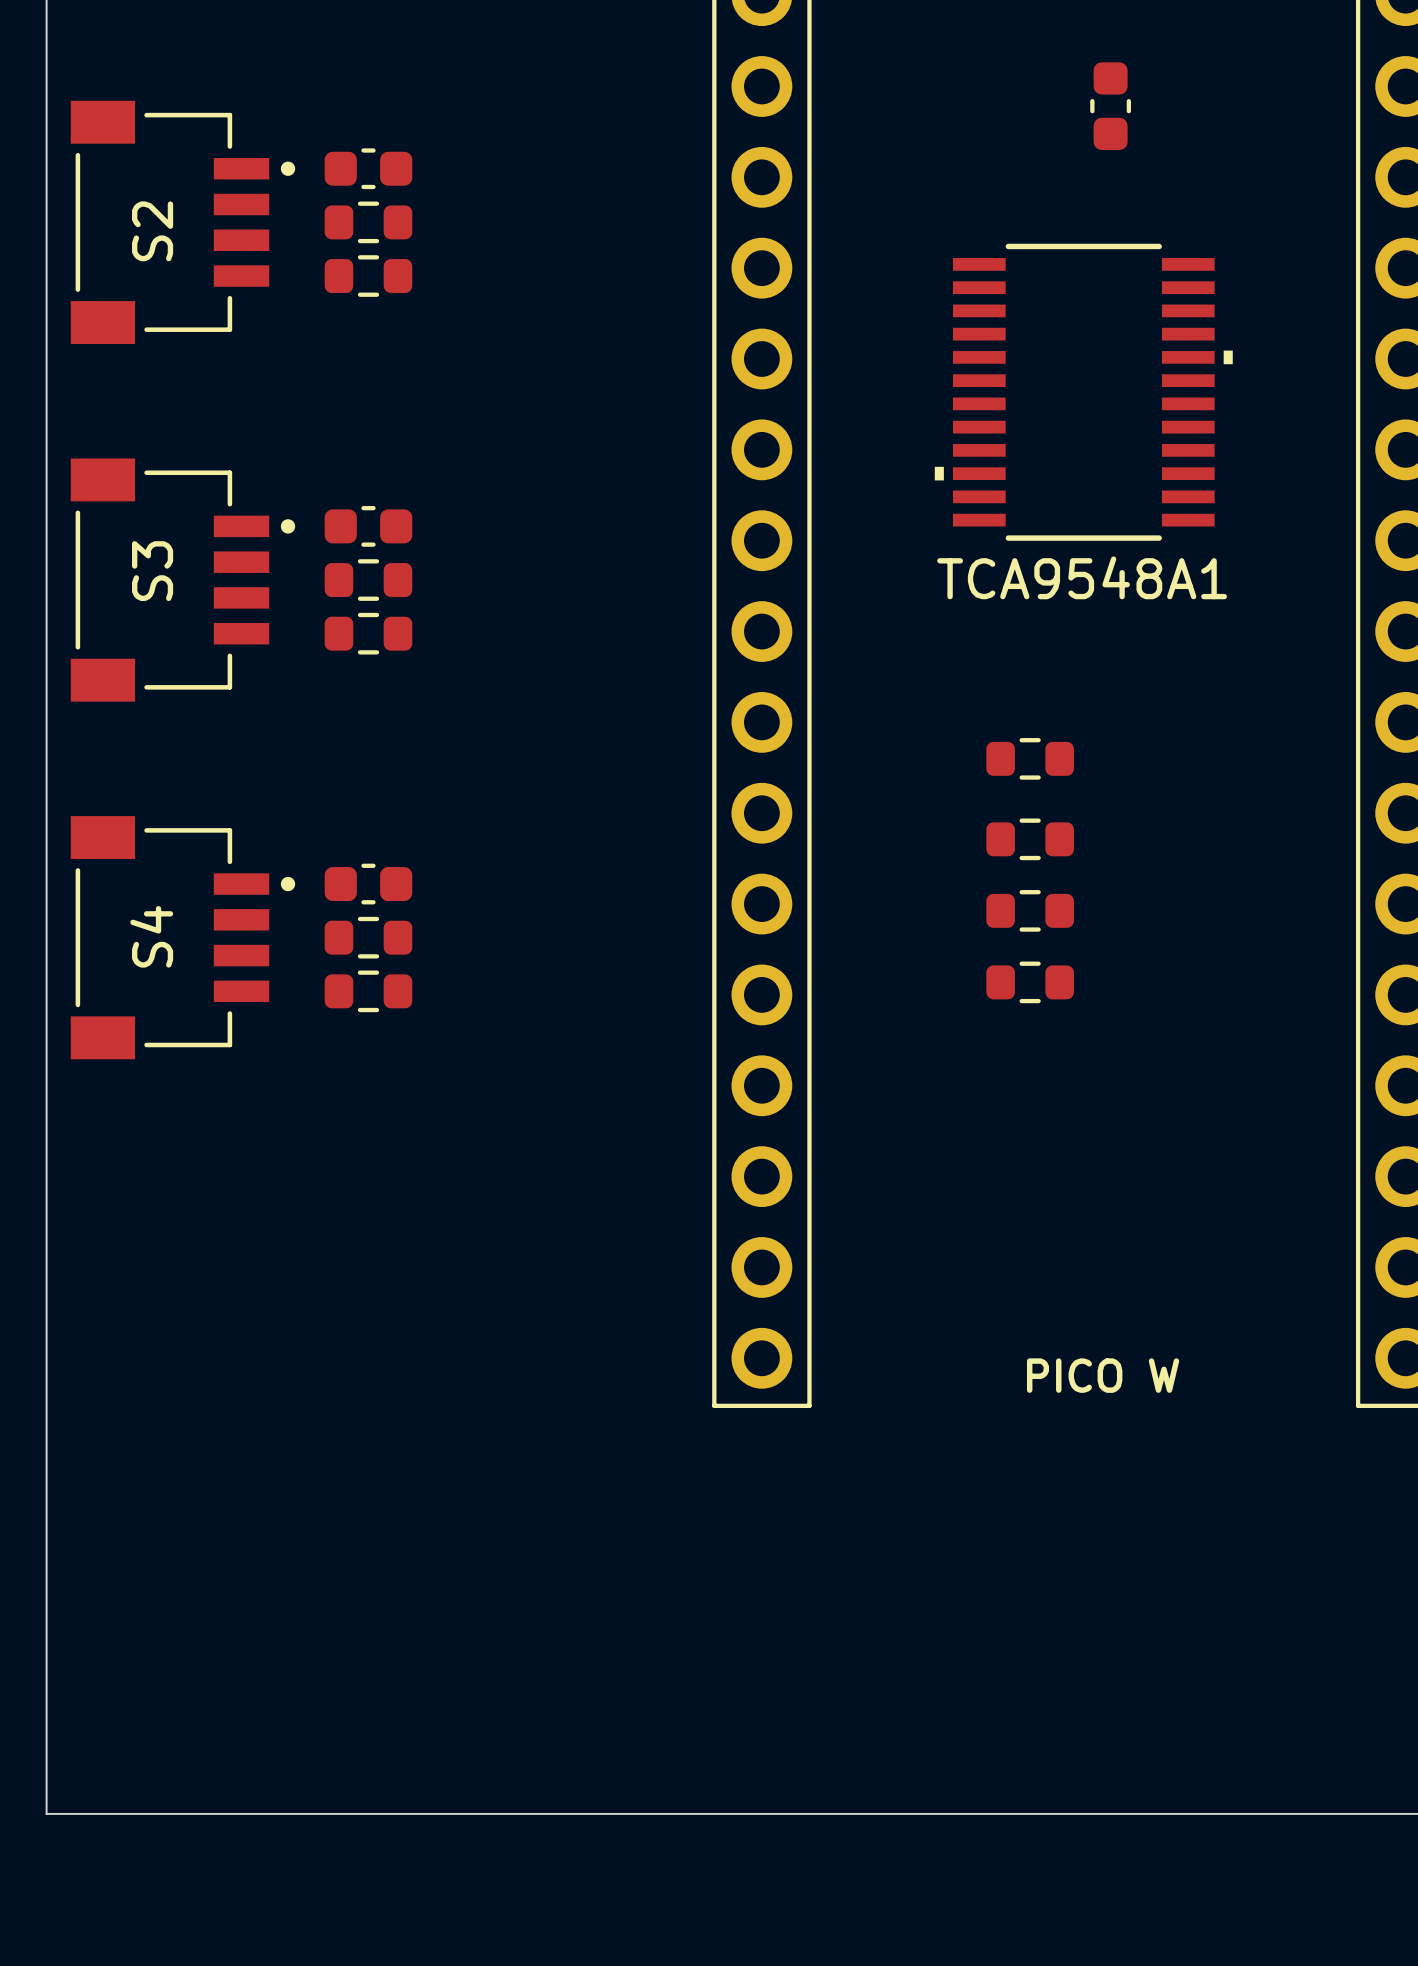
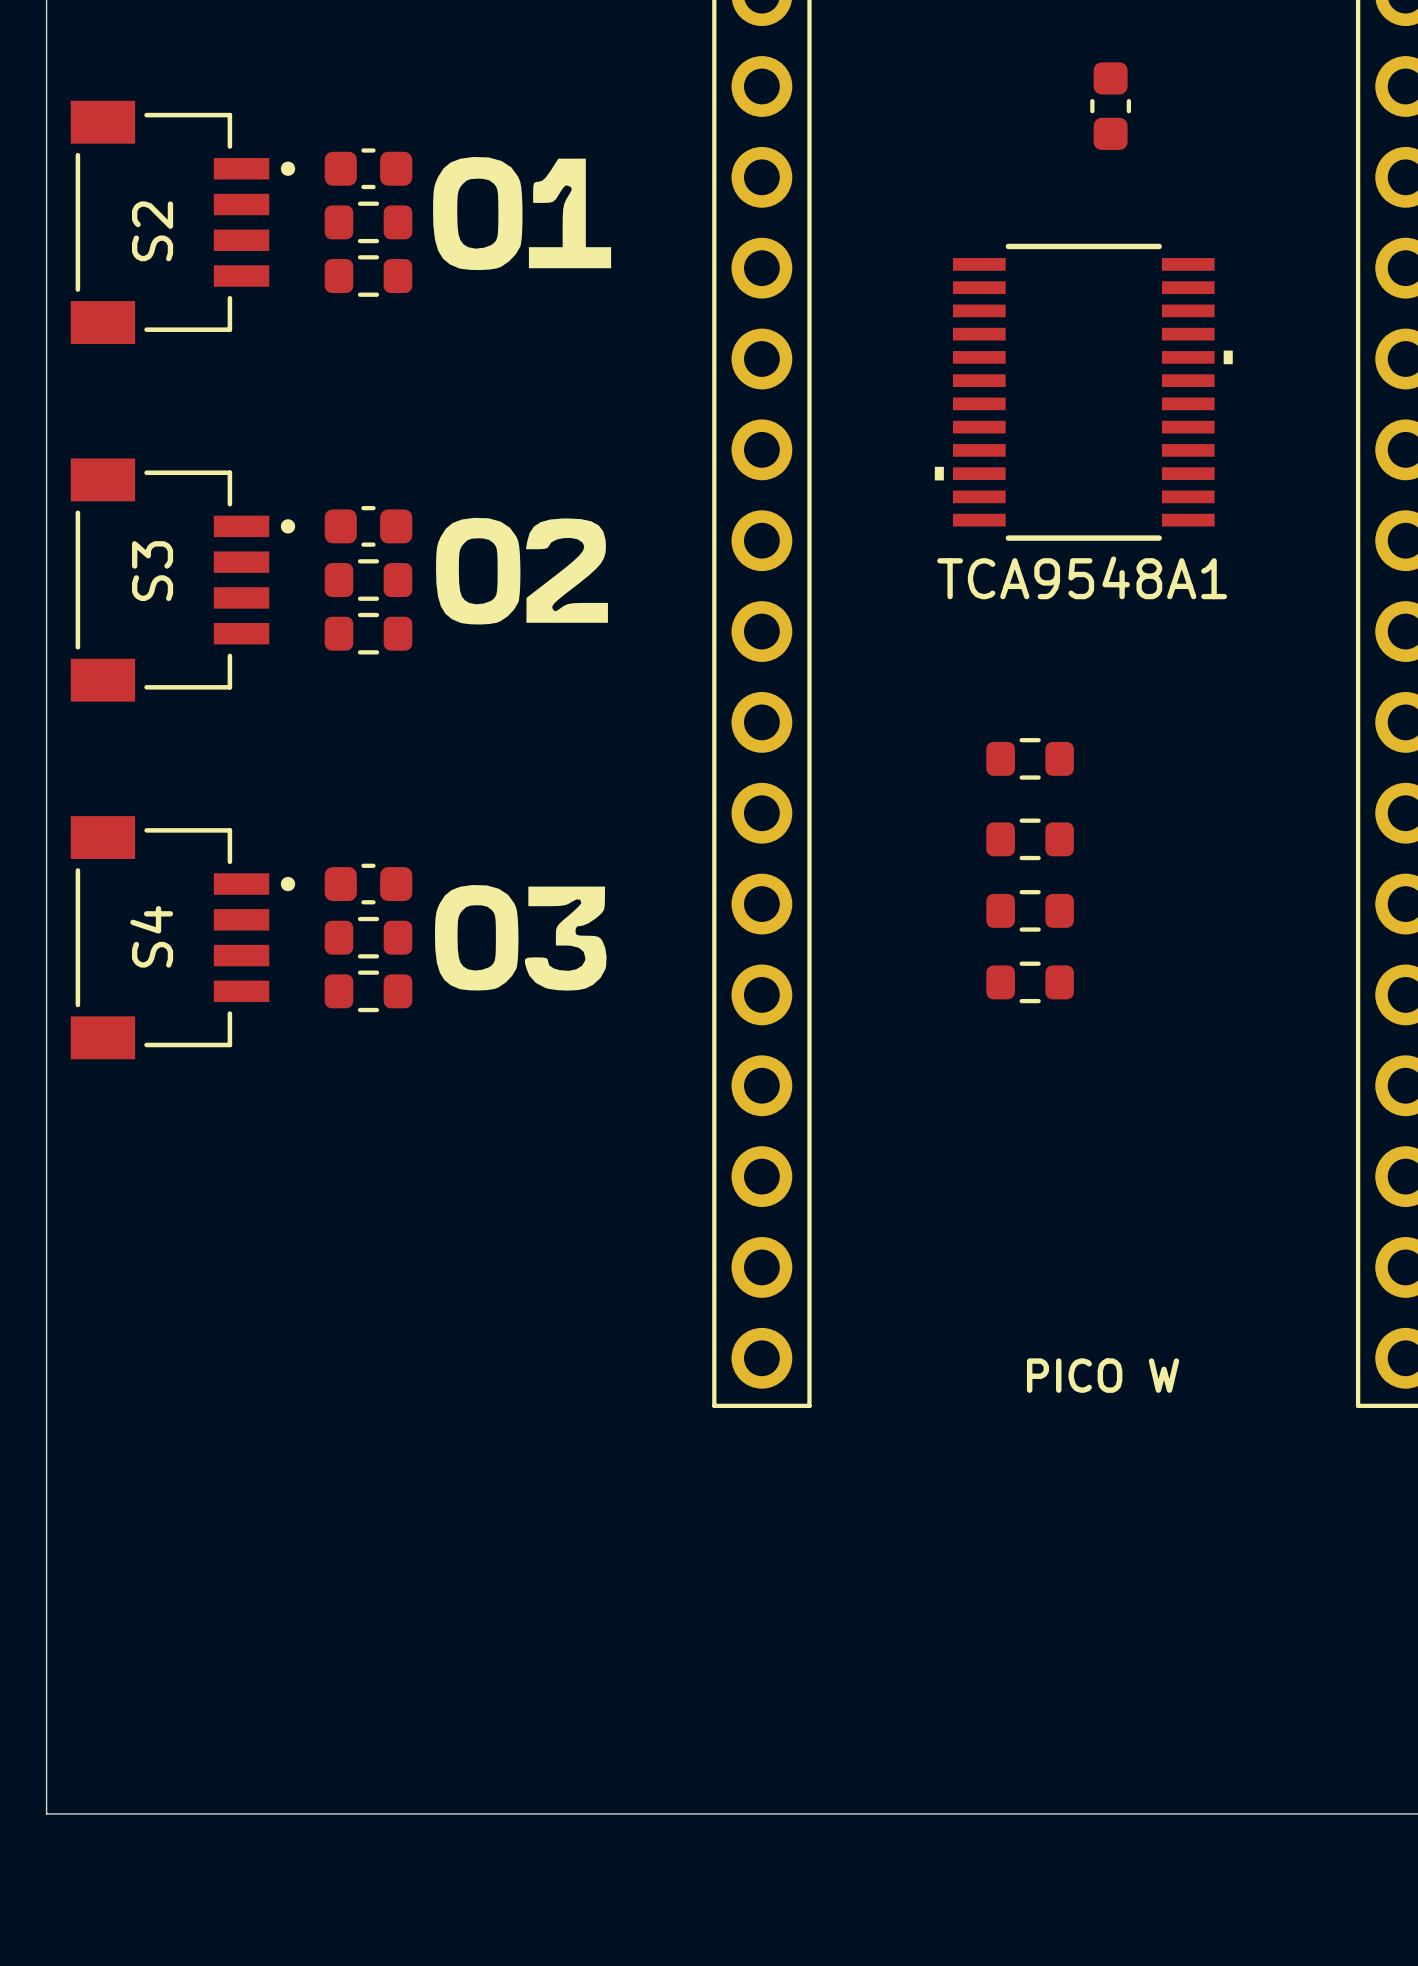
drawing: none -> [433, 156, 612, 271]
drawing: none -> [436, 517, 608, 625]
drawing: none -> [434, 885, 607, 991]

